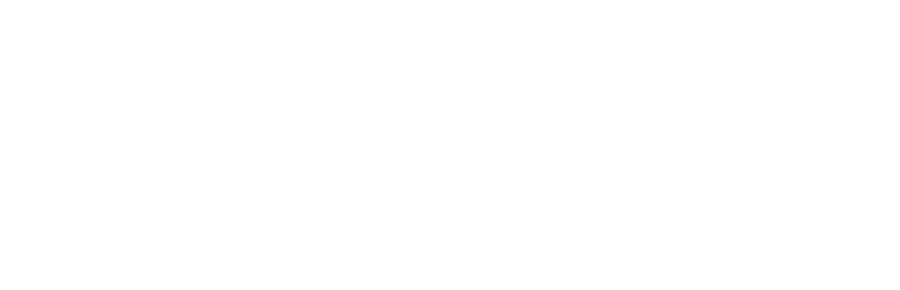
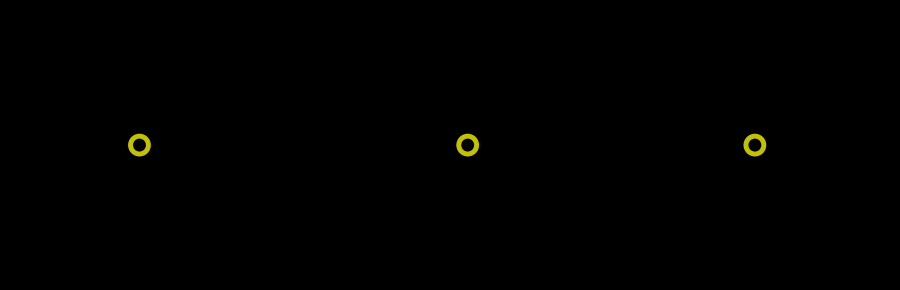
part: none -> (139, 145)
part: none -> (467, 145)
part: none -> (754, 145)

